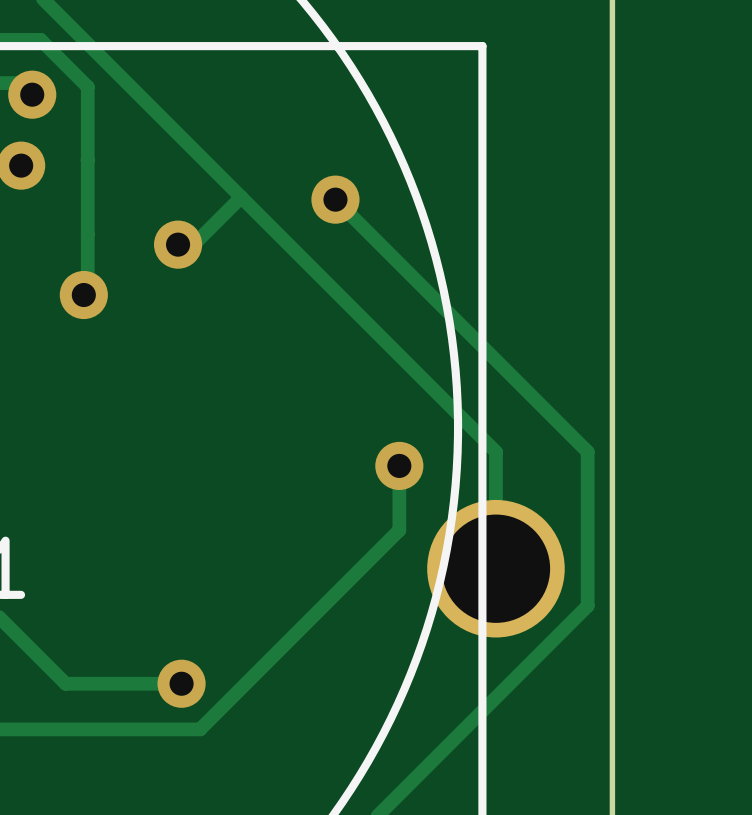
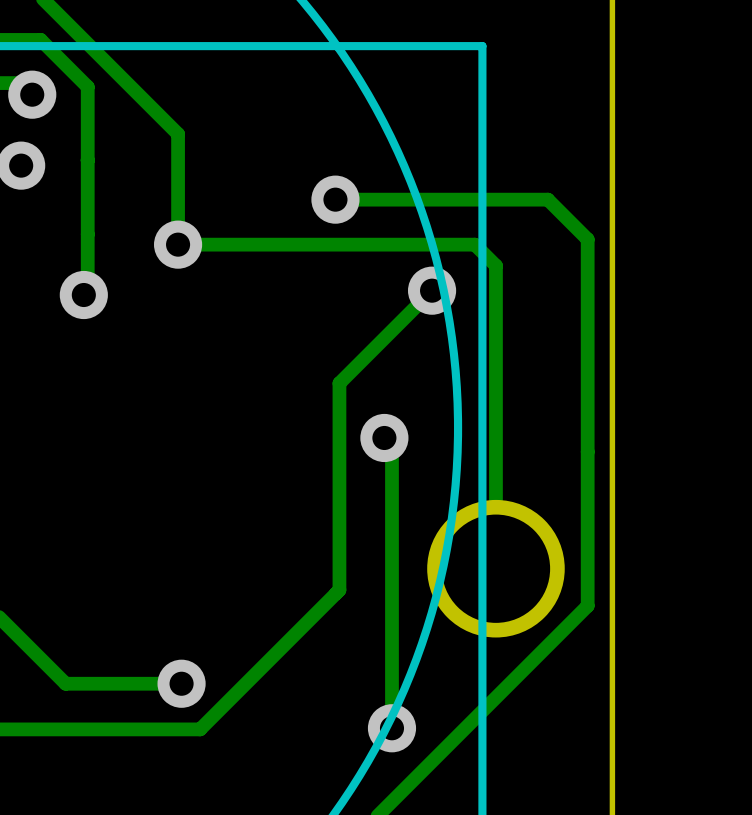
track: (178, 134) (495, 451) -> (193, 244) (474, 244) (495, 265) (495, 451)
track: none -> (178, 134) (178, 244)
track: (241, 197) (193, 244) -> none
track: (335, 199) (587, 451) -> (335, 199) (547, 199) (587, 239) (587, 451)
via: none -> (432, 290)
track: none -> (384, 437) (391, 445) (391, 728)
track: (399, 465) (399, 530) (339, 590) -> (432, 290) (339, 383) (339, 590)
via position: (399, 465) -> (384, 437)
via: none -> (391, 728)

